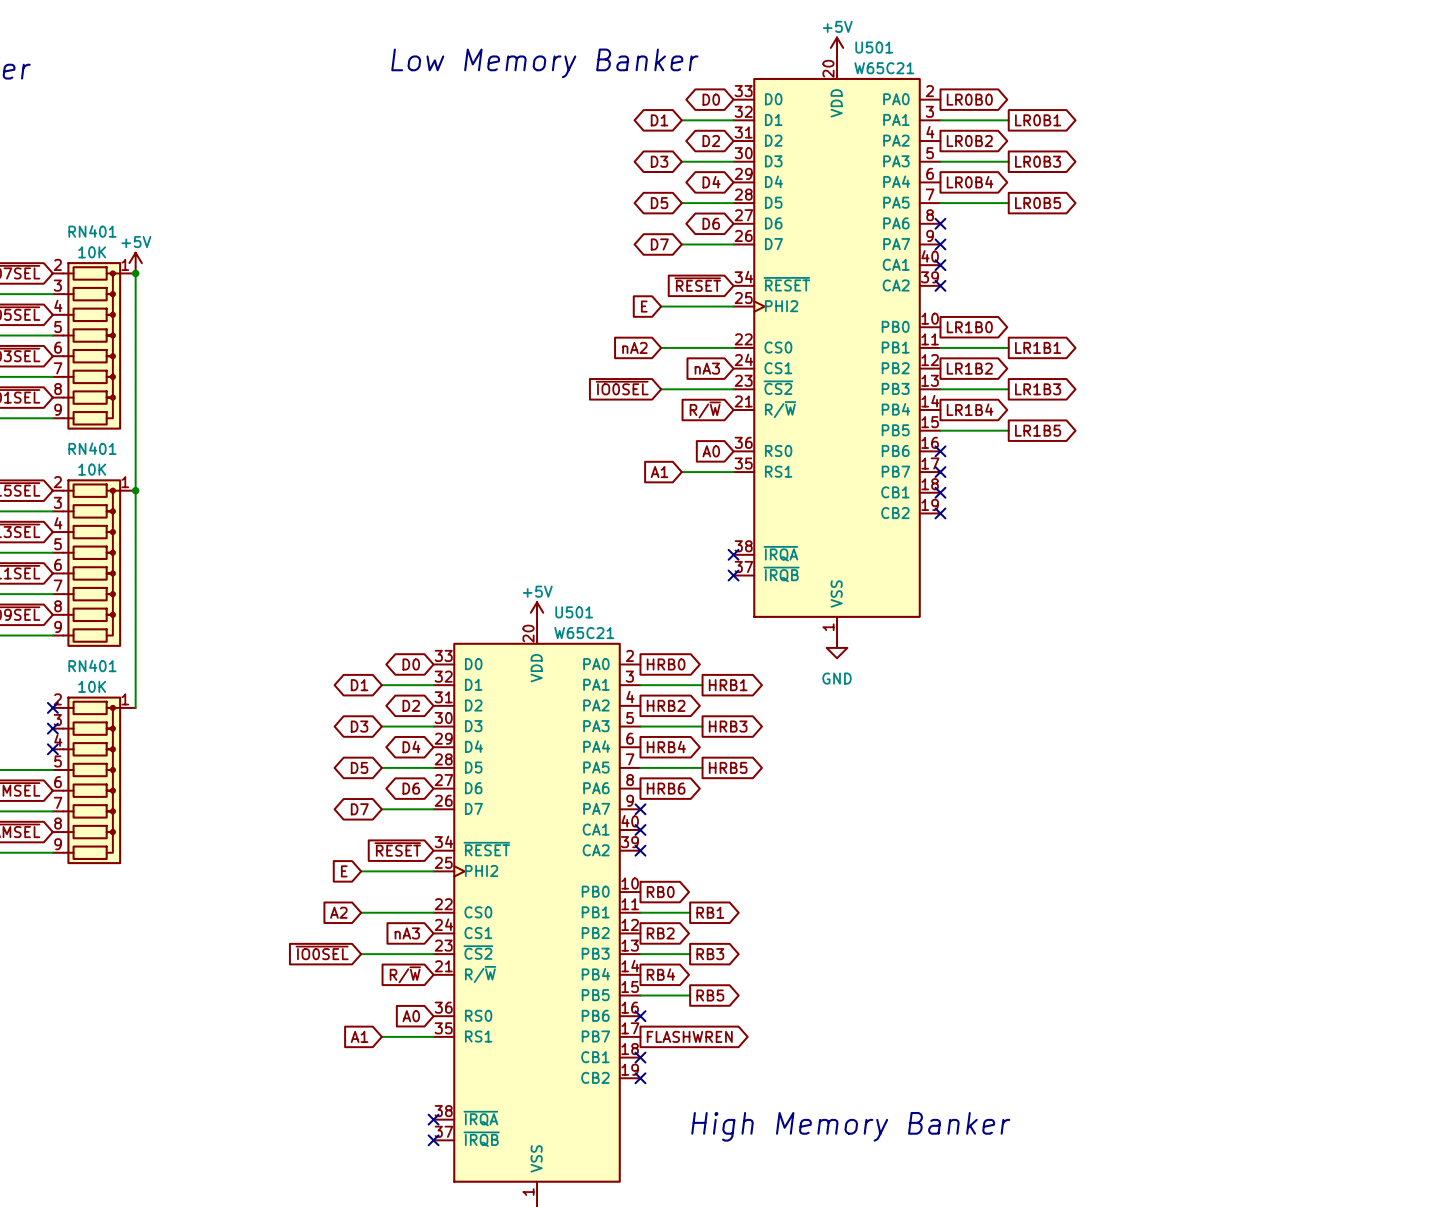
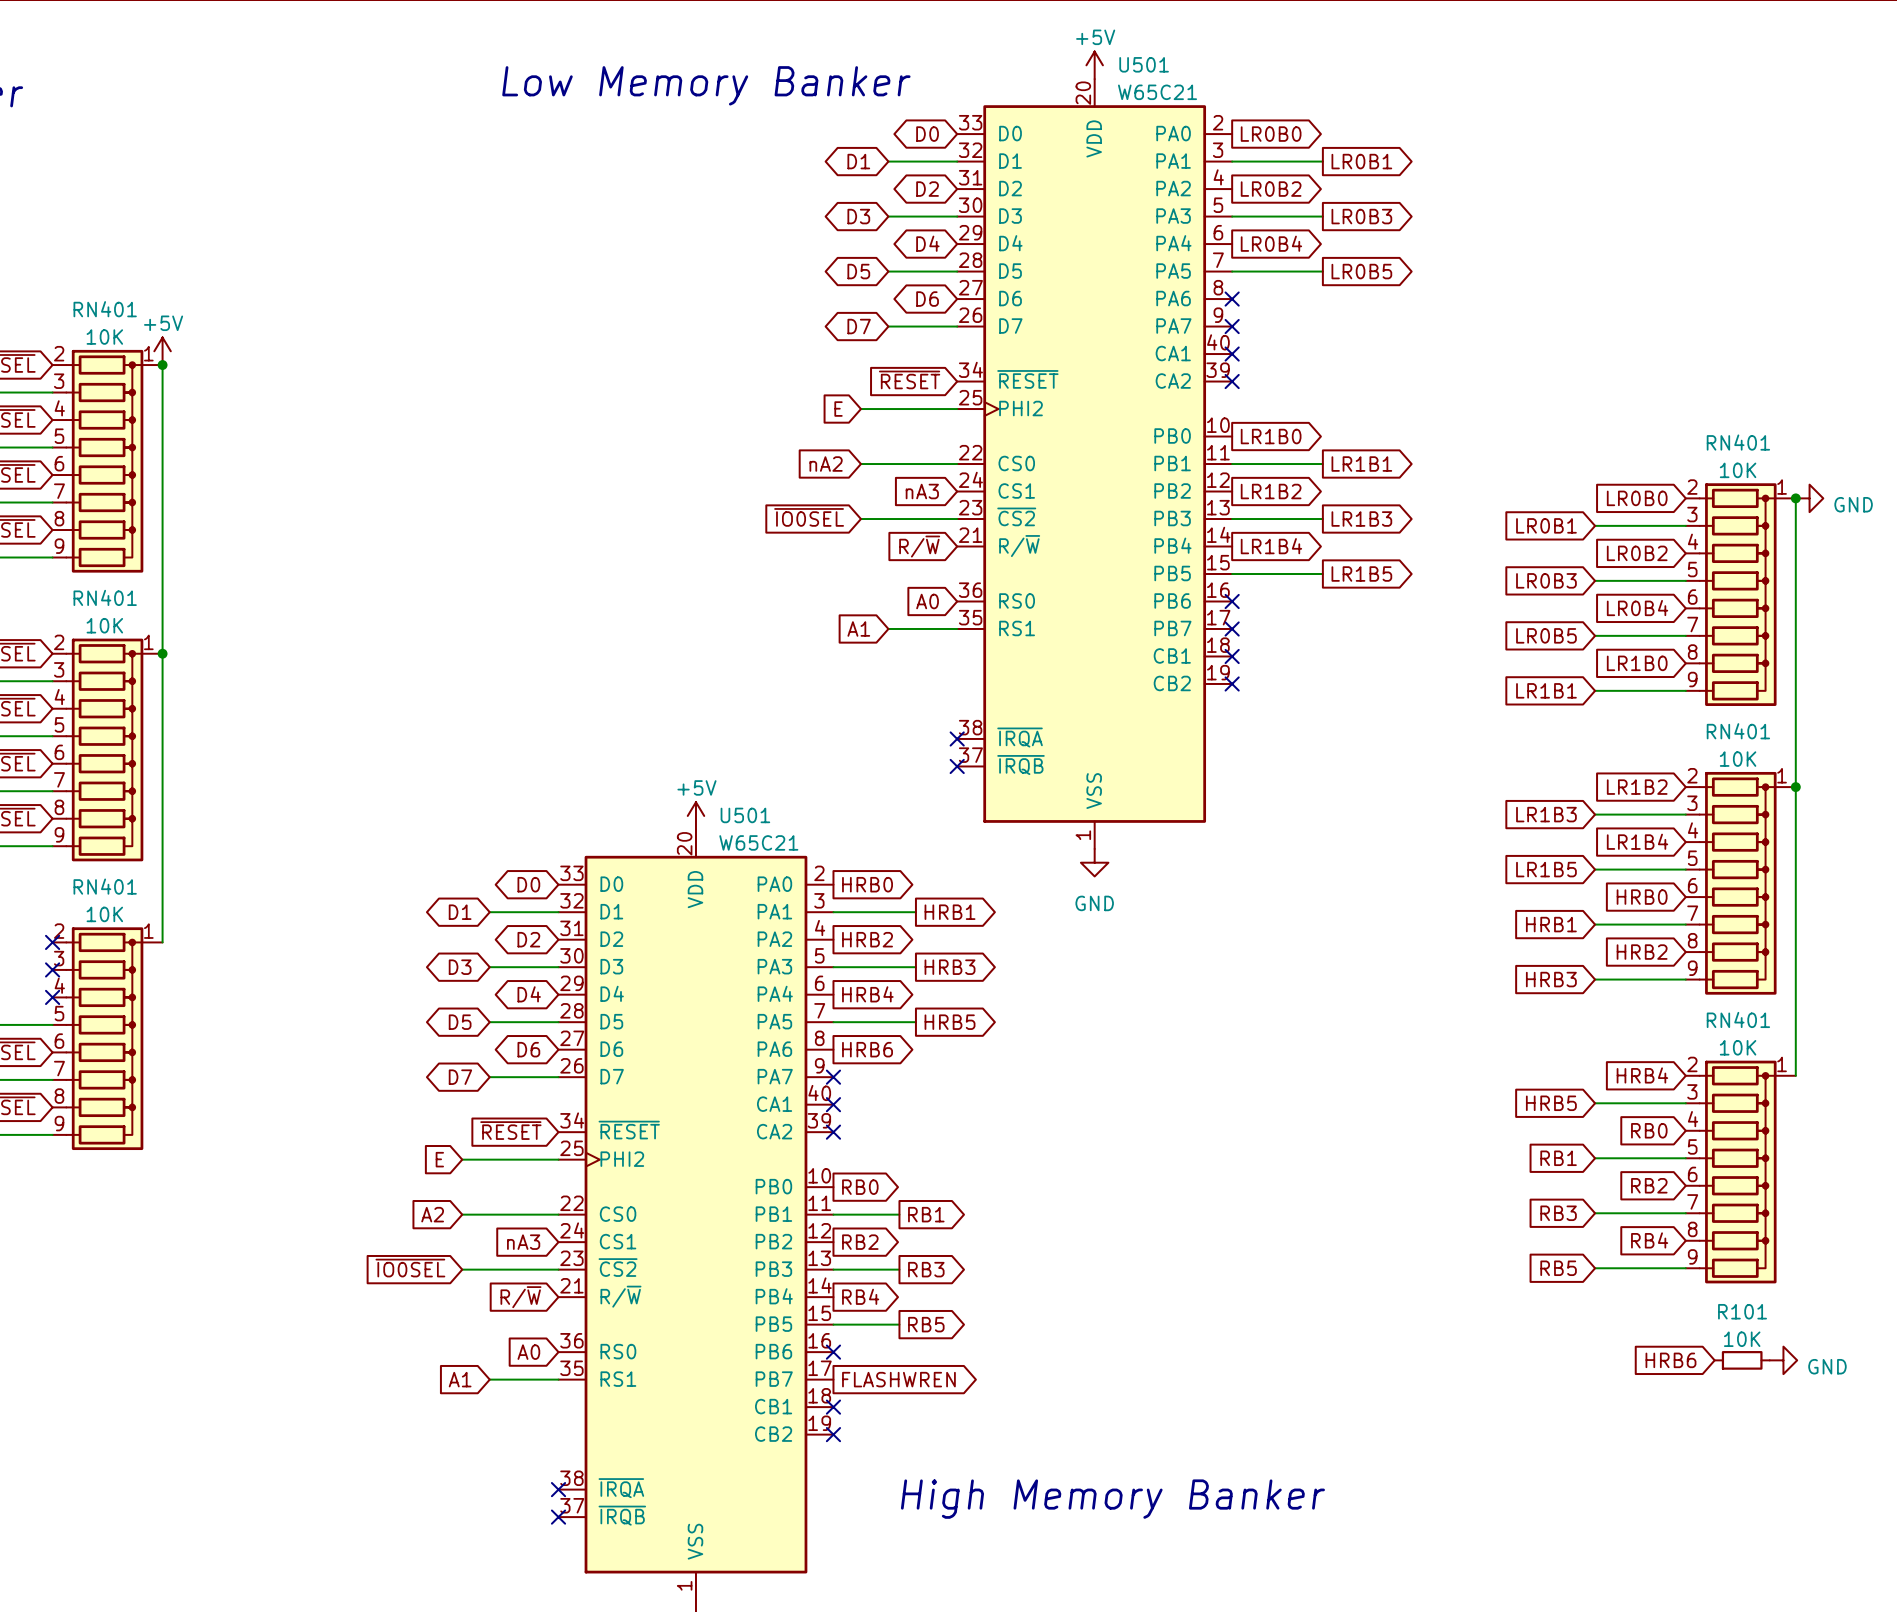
global label: none -> LR0B0 (1637, 498)
wire: none -> (1795, 498) (1795, 1075)
junction: none -> (1795, 498)
power symbol: none -> GND (1809, 498)
global label: none -> LR0B1 (1546, 525)
wire: none -> (1595, 525) (1685, 525)
global label: none -> LR0B2 (1637, 553)
global label: none -> LR0B3 (1546, 580)
wire: none -> (1595, 580) (1685, 580)
RN401: none -> 10K (1740, 594)
global label: none -> LR0B4 (1637, 608)
global label: none -> LR0B5 (1546, 635)
wire: none -> (1595, 635) (1685, 635)
global label: none -> LR1B0 (1637, 663)
global label: none -> LR1B1 (1546, 690)
wire: none -> (1595, 690) (1685, 690)
global label: none -> LR1B2 (1637, 787)
junction: none -> (1795, 787)
global label: none -> LR1B3 (1546, 814)
wire: none -> (1595, 814) (1685, 814)
global label: none -> LR1B4 (1637, 841)
global label: none -> LR1B5 (1546, 869)
wire: none -> (1595, 869) (1685, 869)
RN401: none -> 10K (1740, 883)
global label: none -> HRB0 (1642, 897)
global label: none -> HRB1 (1551, 924)
wire: none -> (1595, 924) (1685, 924)
global label: none -> HRB2 (1642, 952)
global label: none -> HRB3 (1551, 979)
wire: none -> (1595, 979) (1685, 979)
global label: none -> HRB4 (1642, 1075)
global label: none -> HRB5 (1551, 1103)
wire: none -> (1595, 1103) (1685, 1103)
global label: none -> RB0 (1649, 1130)
global label: none -> RB1 (1558, 1158)
wire: none -> (1595, 1158) (1685, 1158)
RN401: none -> 10K (1740, 1172)
global label: none -> RB2 (1649, 1185)
global label: none -> RB3 (1558, 1213)
wire: none -> (1595, 1213) (1685, 1213)
global label: none -> RB4 (1649, 1240)
global label: none -> RB5 (1558, 1268)
wire: none -> (1595, 1268) (1685, 1268)
global label: none -> HRB6 (1670, 1360)
R101: none -> 10K (1742, 1360)
power symbol: none -> GND (1783, 1360)

